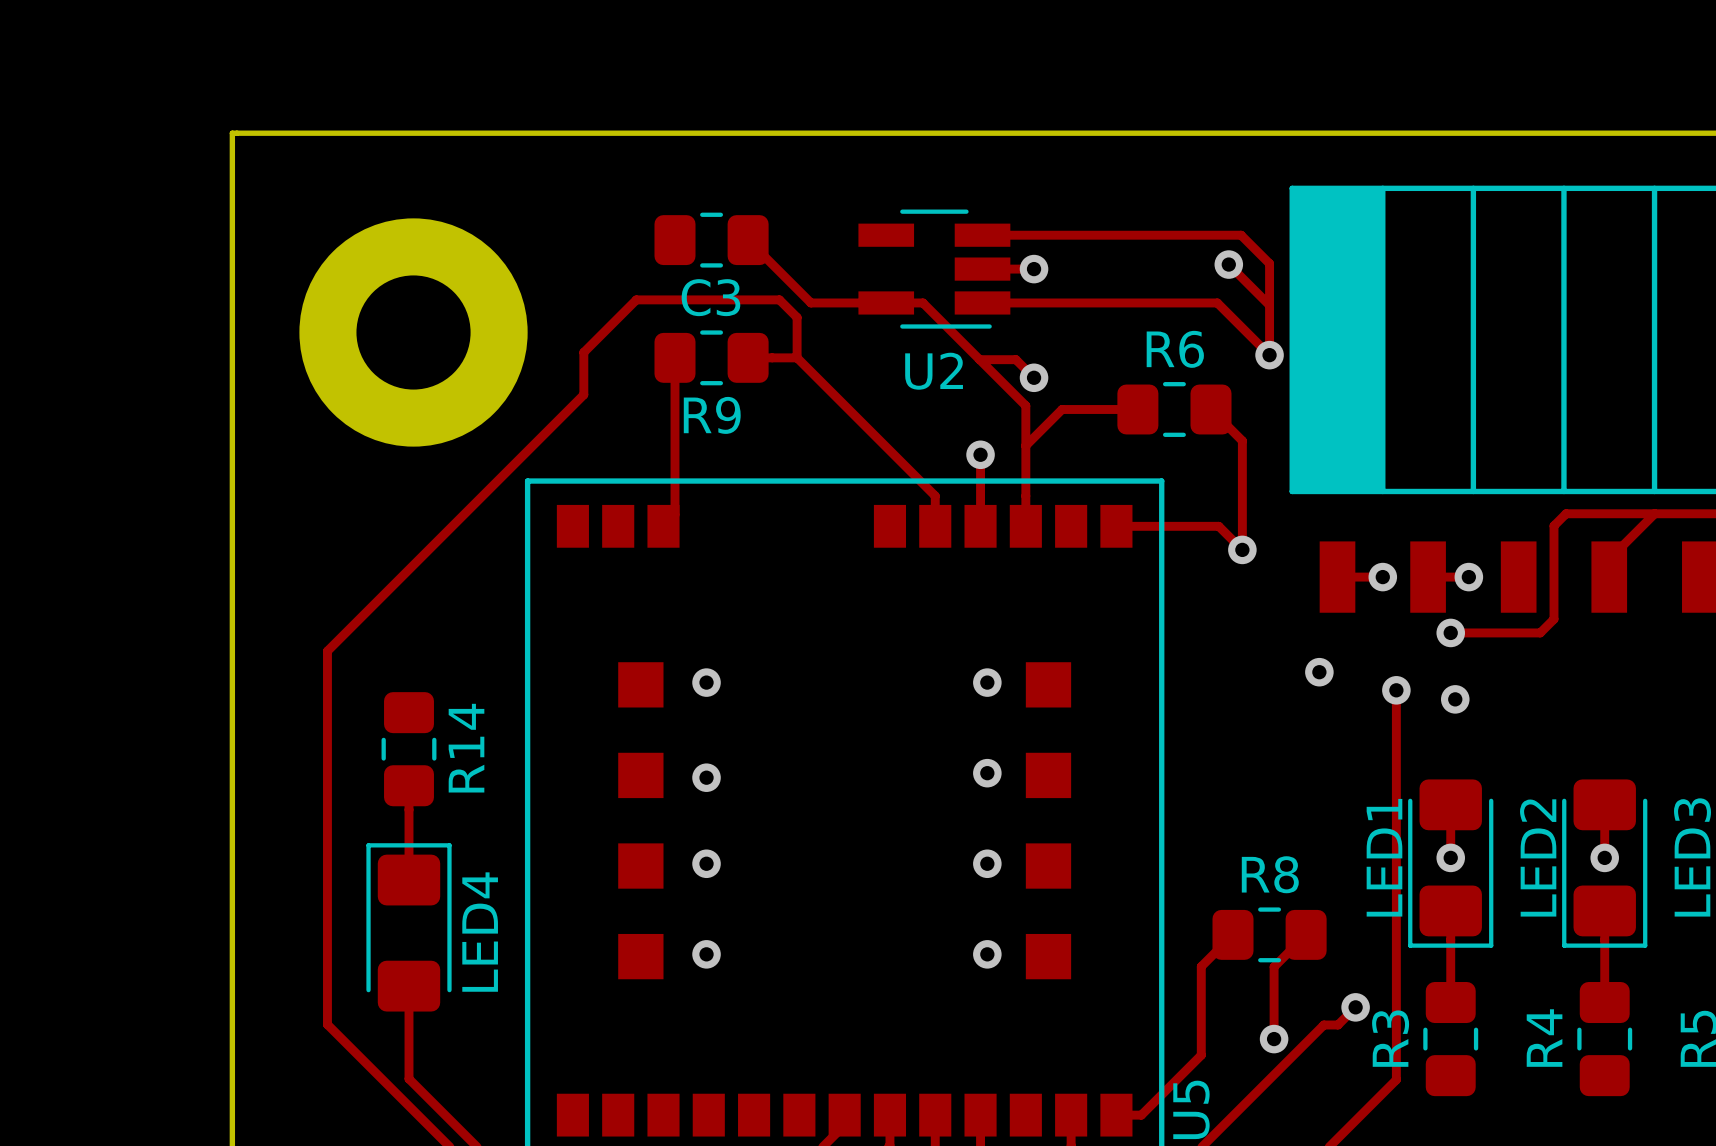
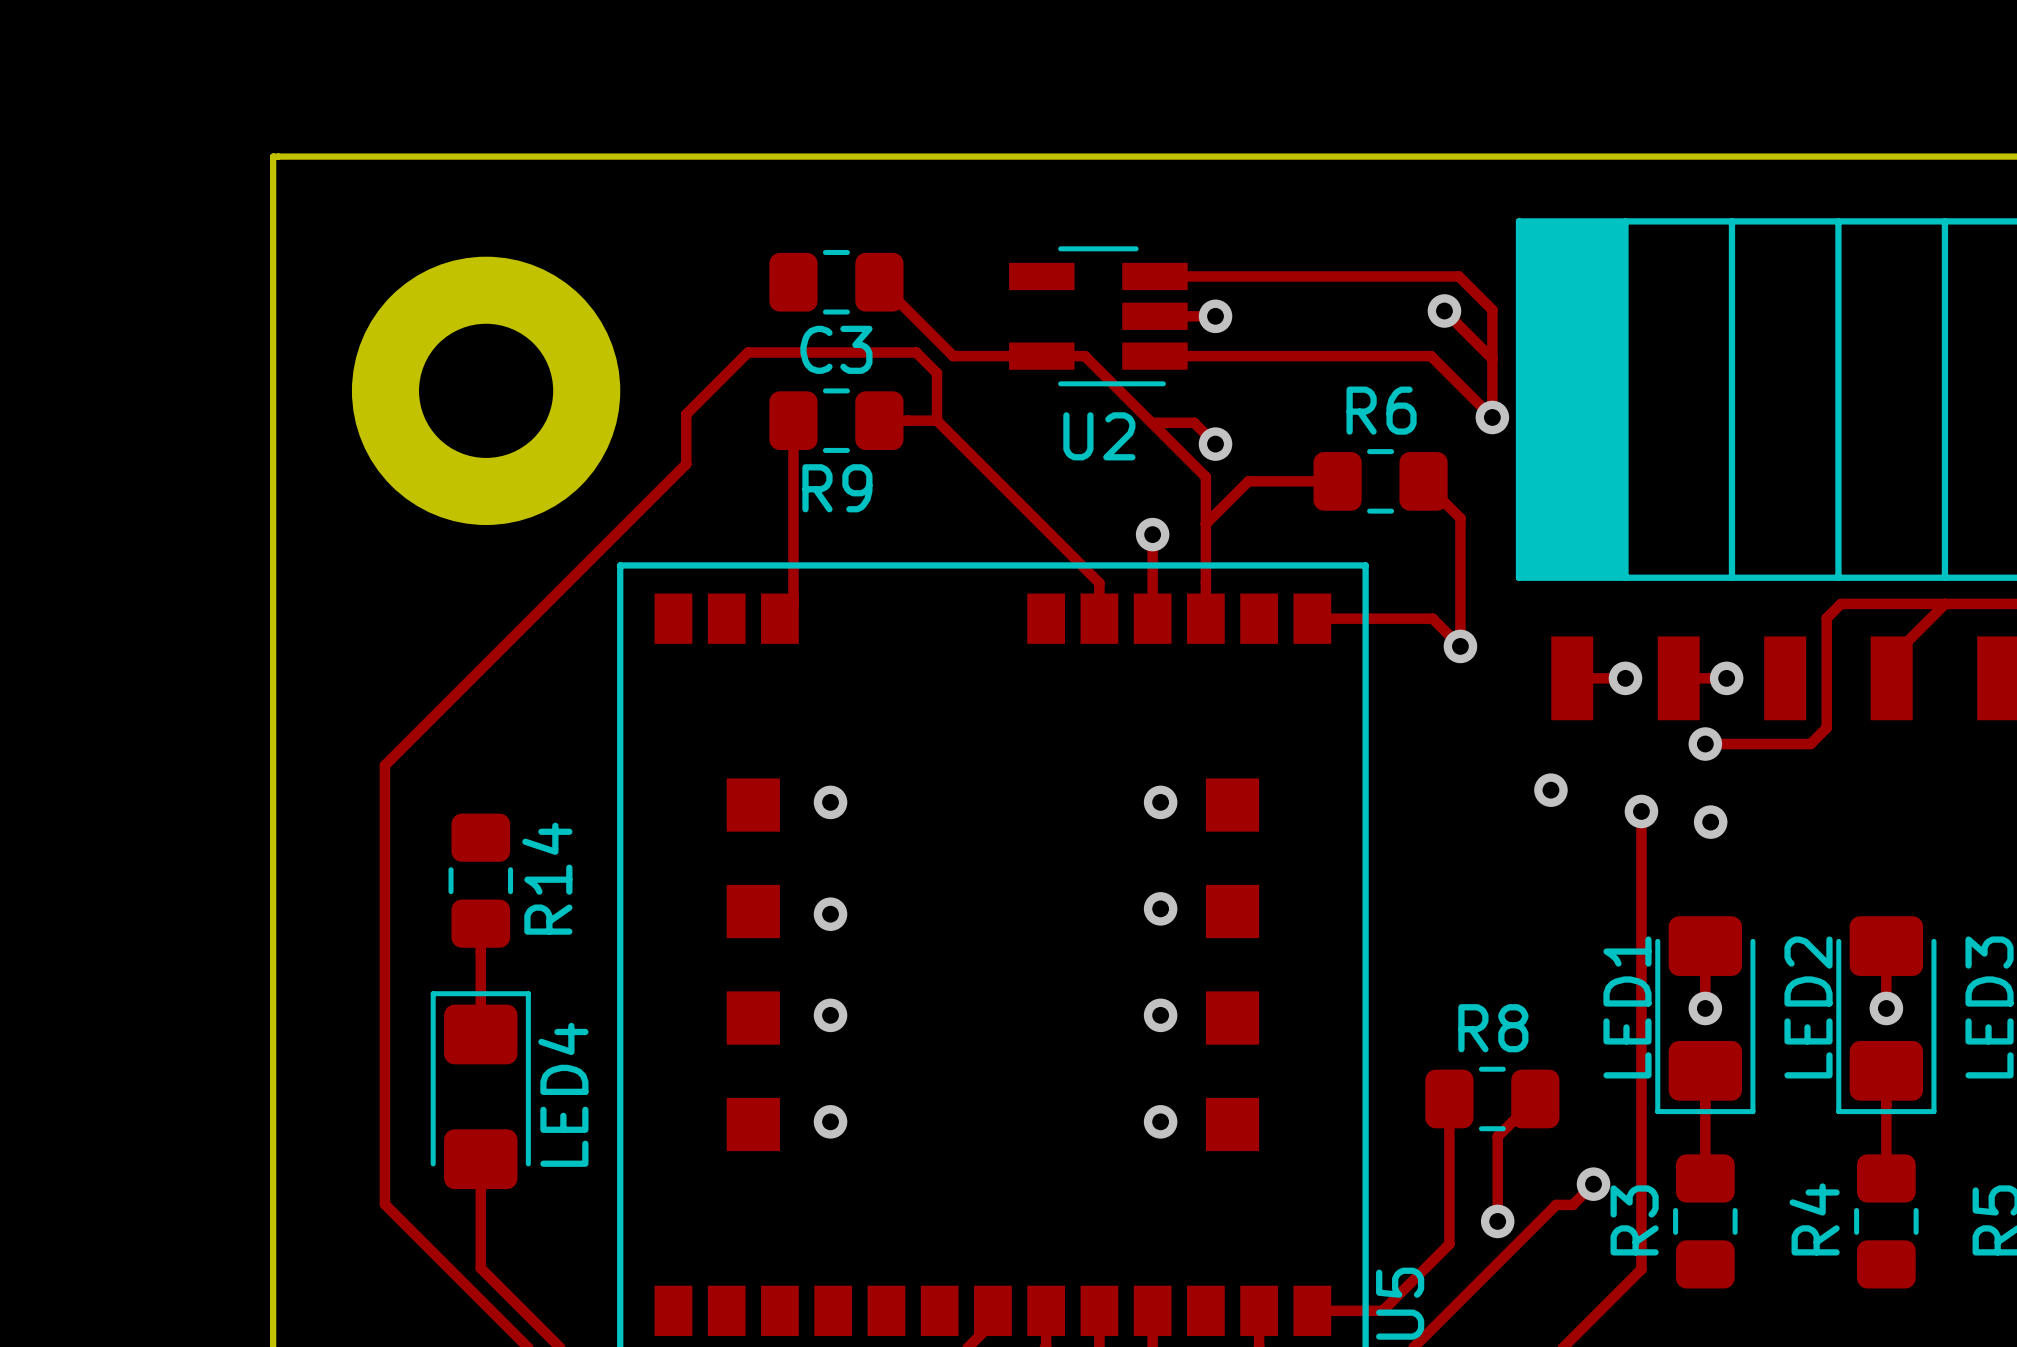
track: (1233, 934) (1201, 966) (1201, 1055) (1141, 1115) -> (1449, 1098) (1449, 1244) (1382, 1310) (1341, 1310)

